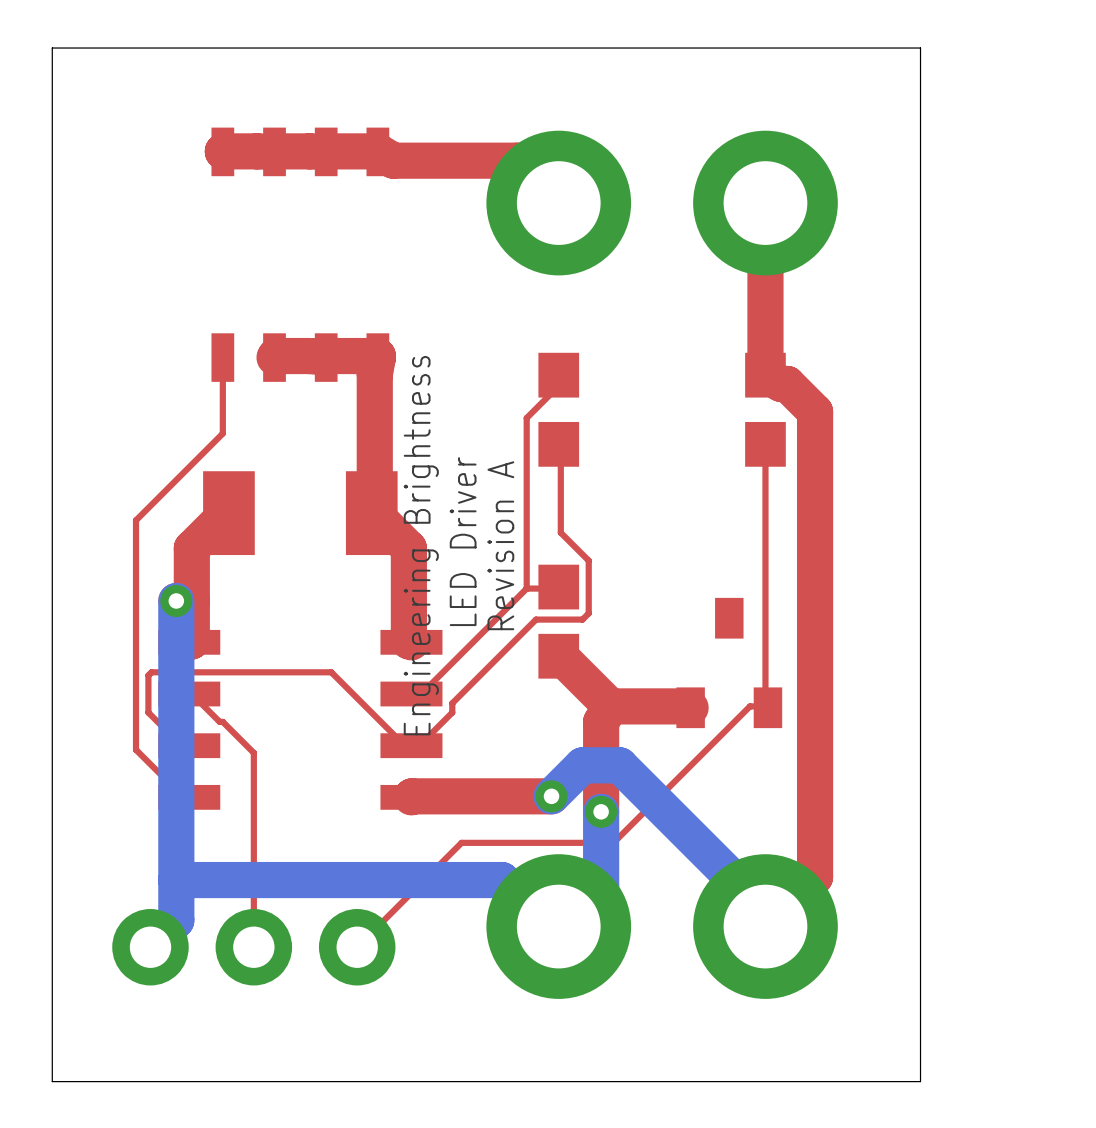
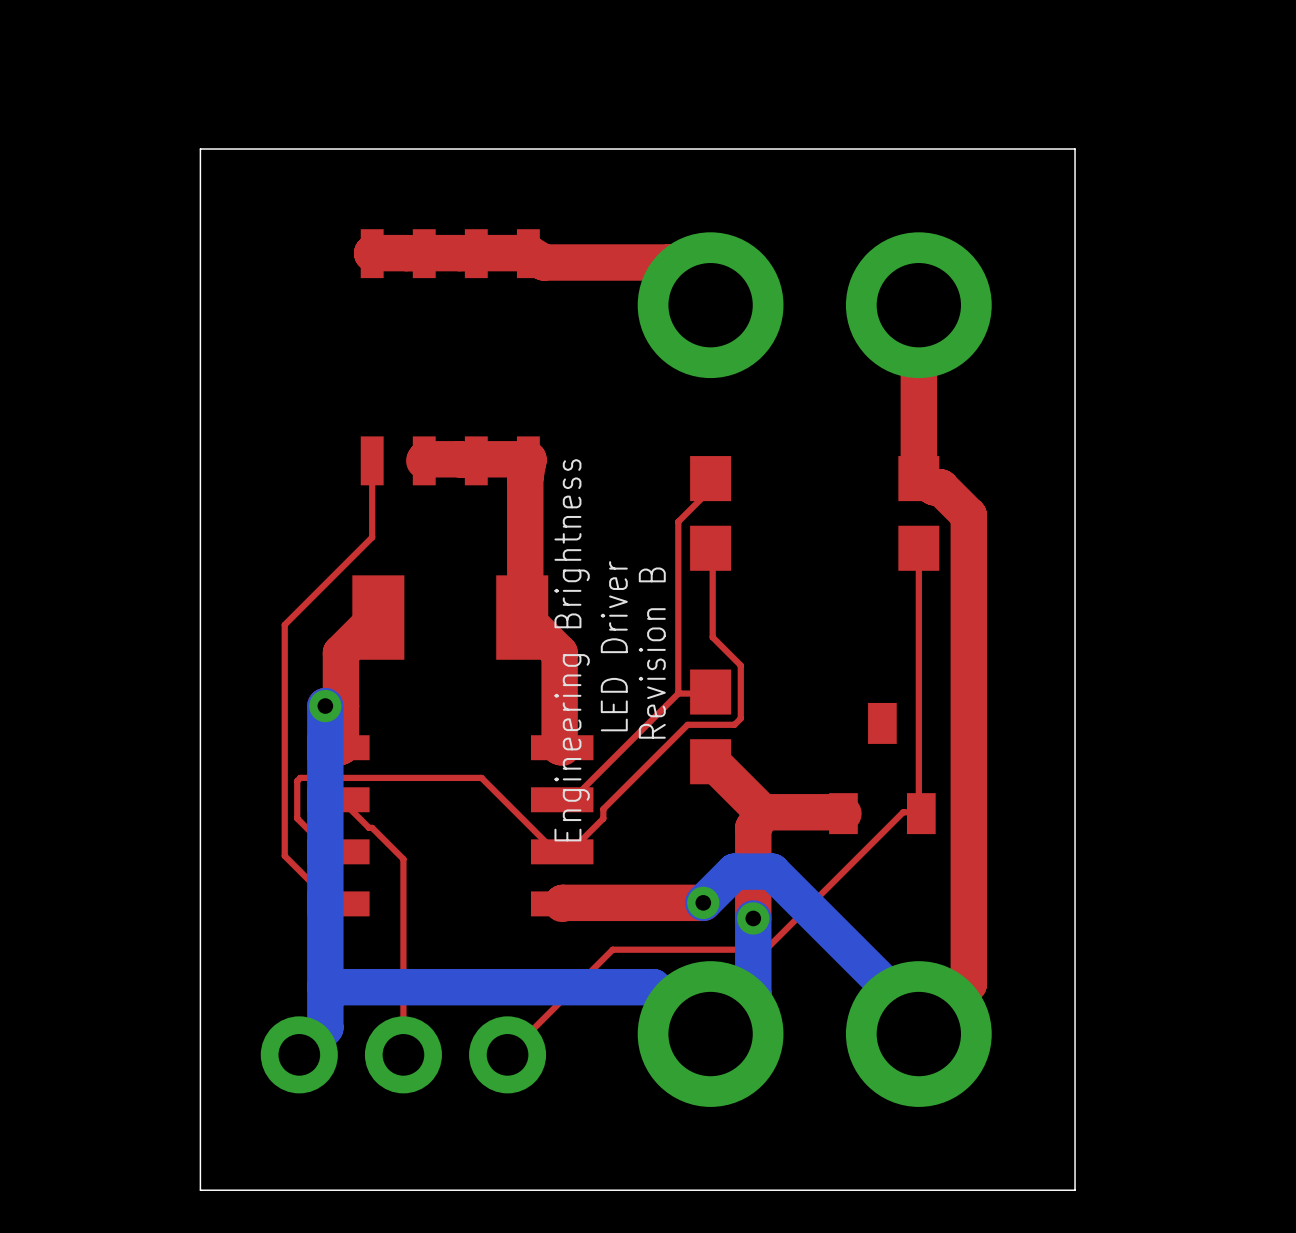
text: Revision A (500, 545) -> Revision B (652, 653)

